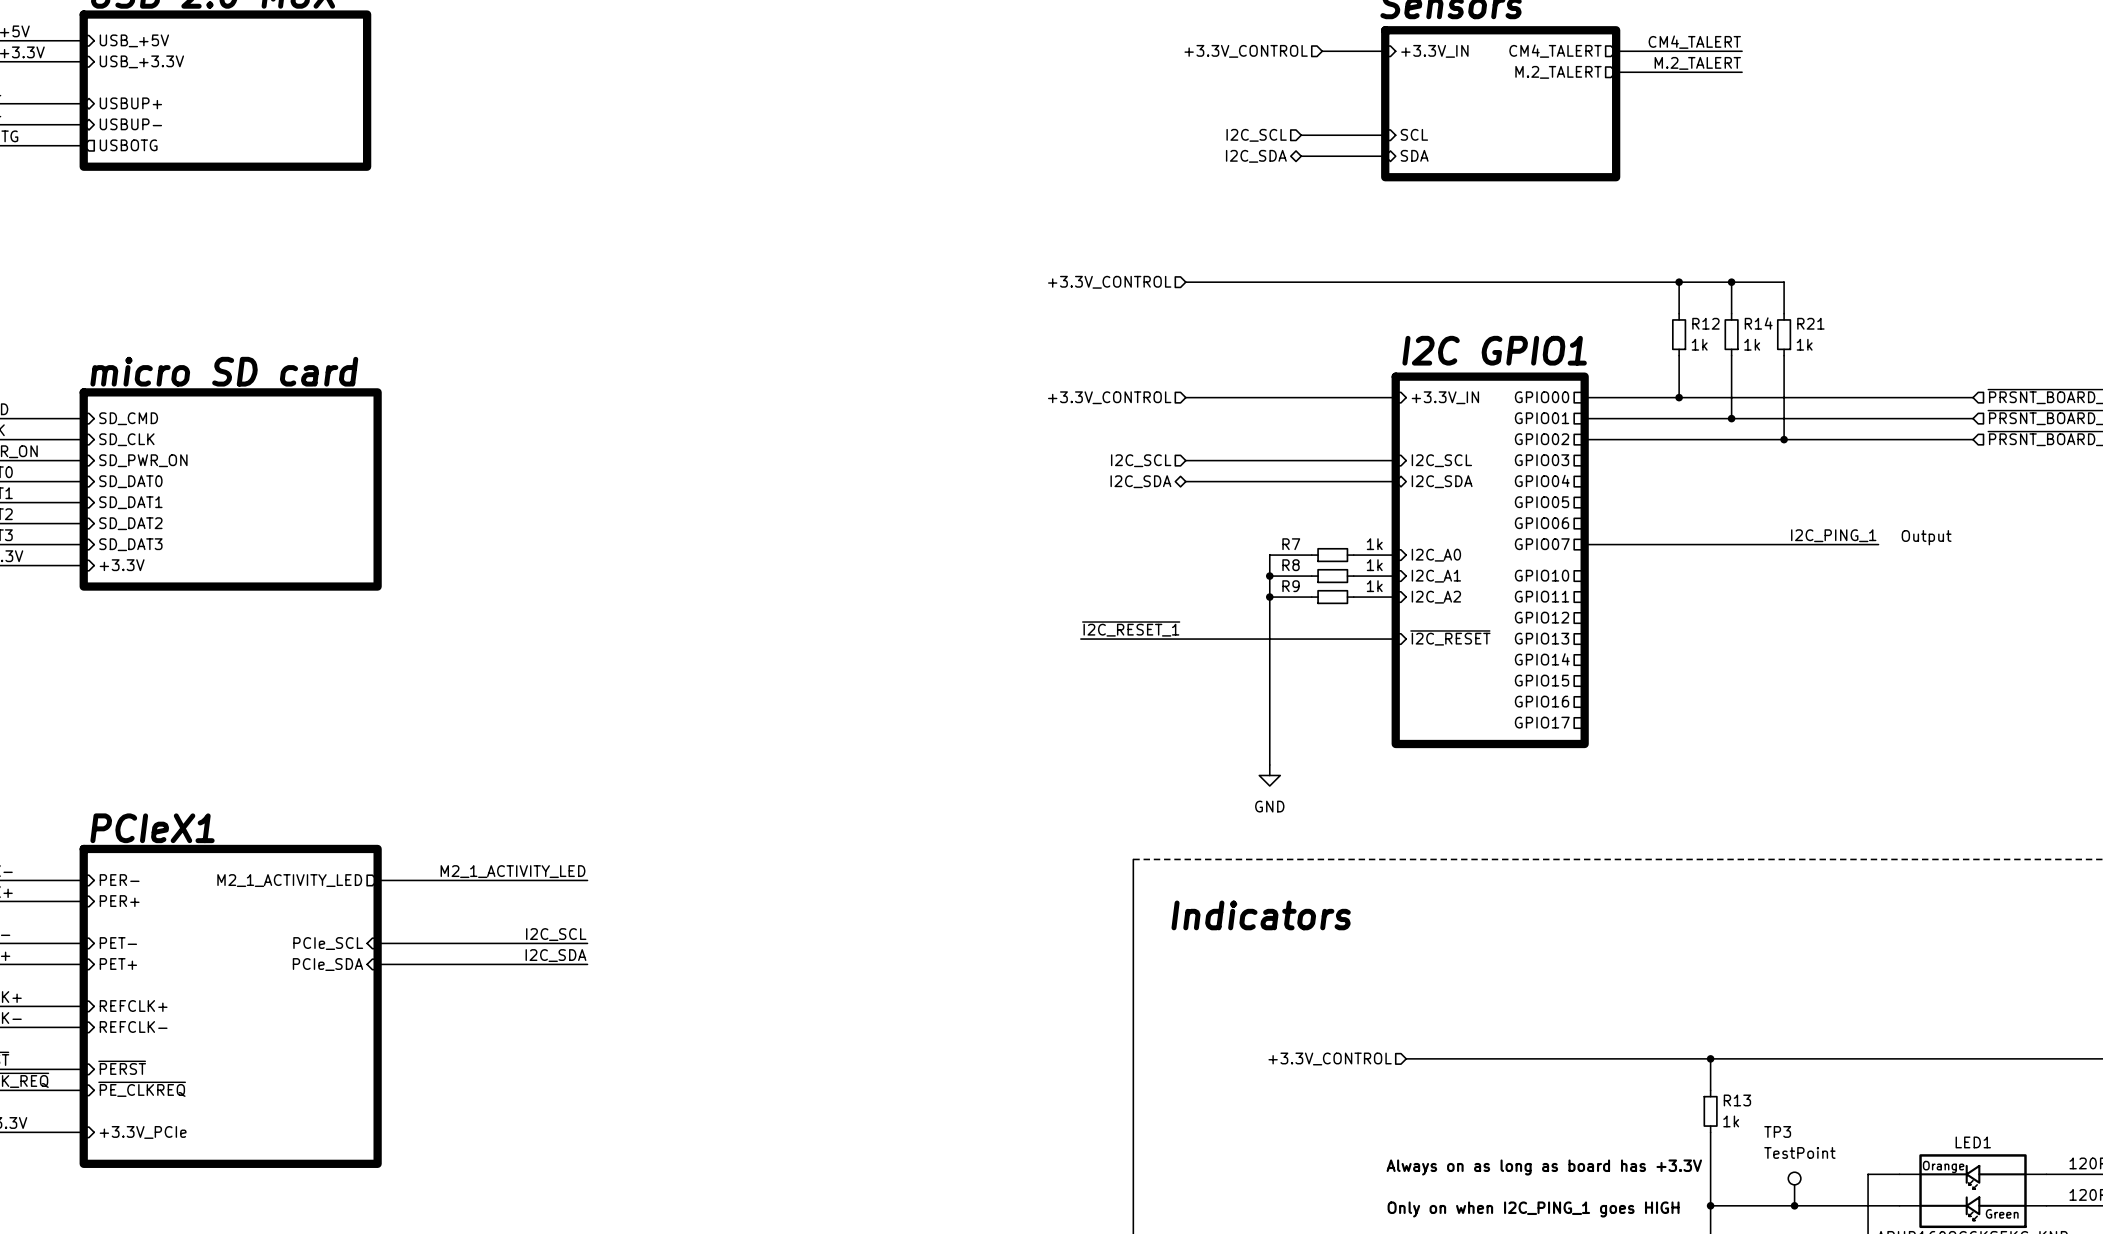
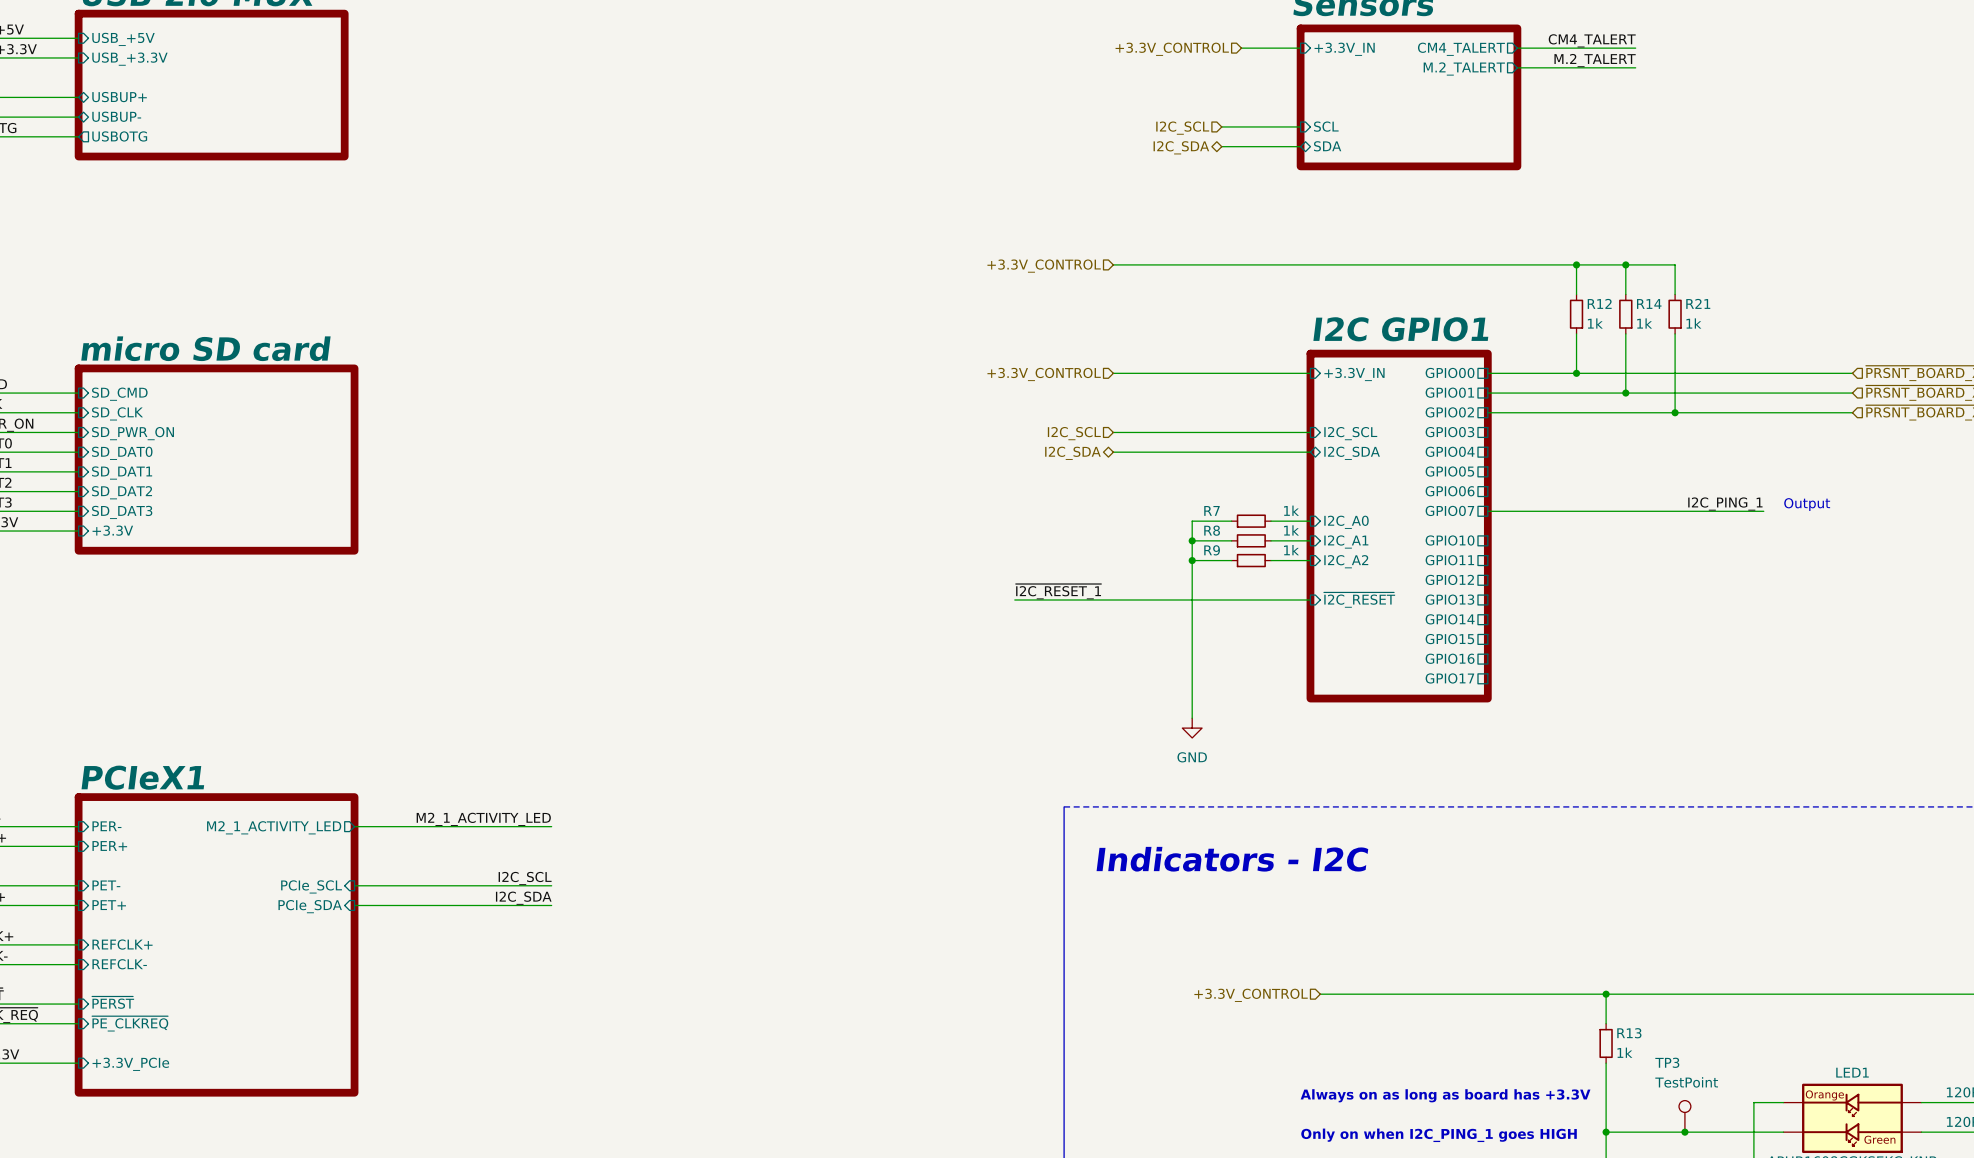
text: Indicators (1261, 915) -> Indicators - I2C (1232, 859)

